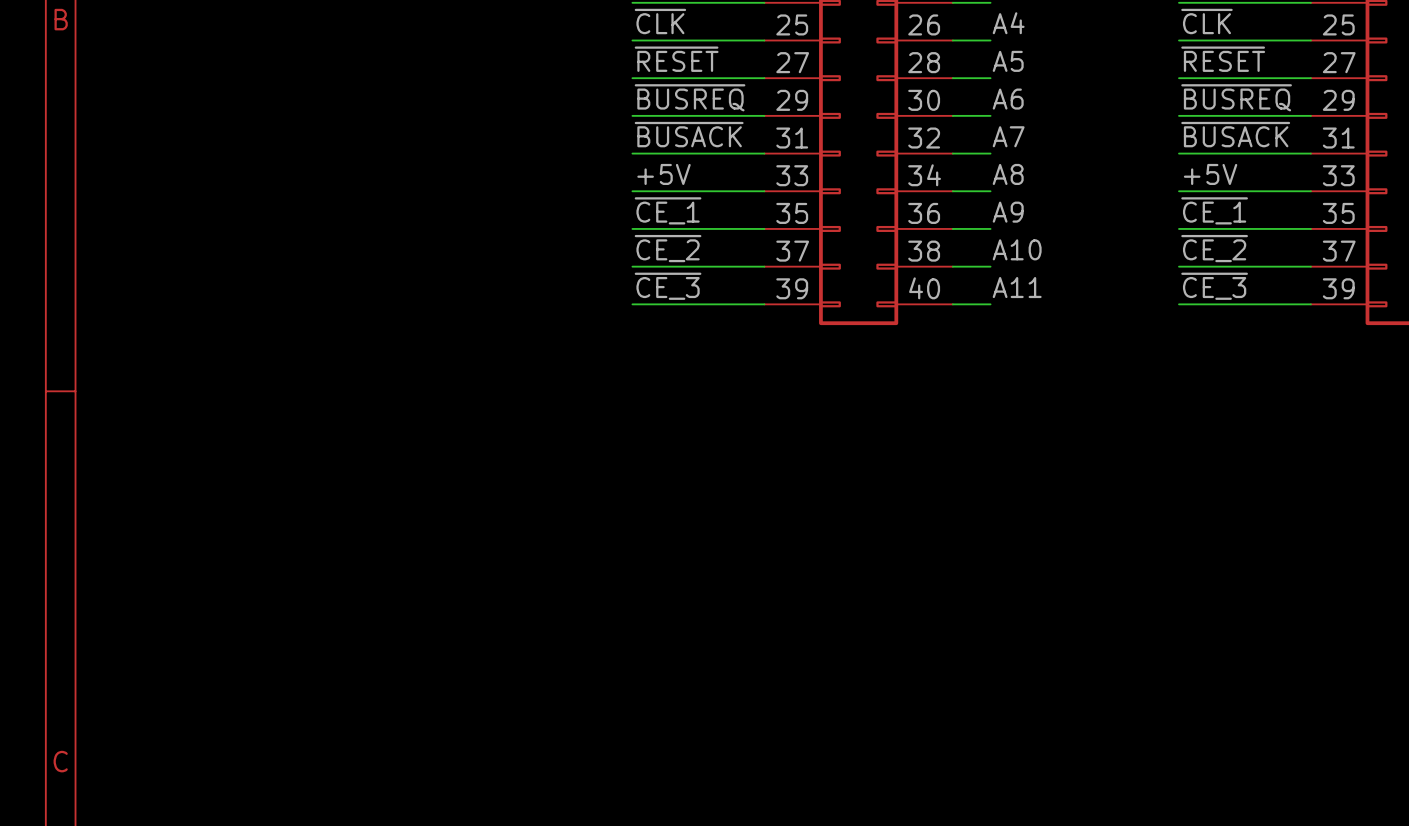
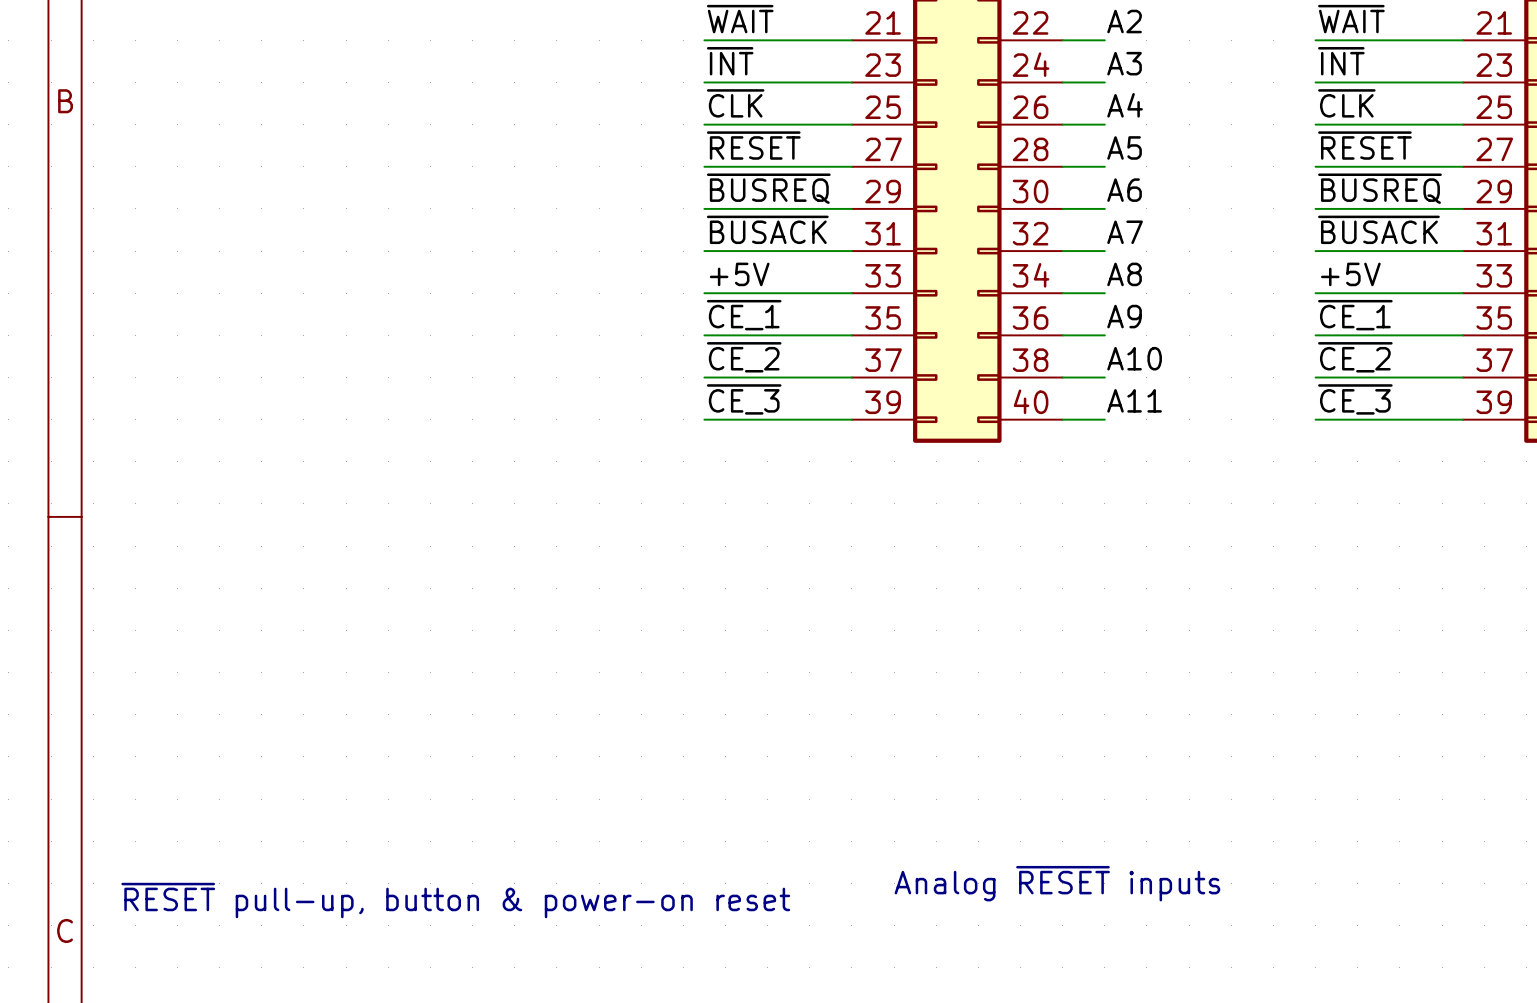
text: none -> Analog ~{RESET} inputs (1057, 883)
text: none -> ~{RESET} pull-up, button & power-on reset (455, 900)

